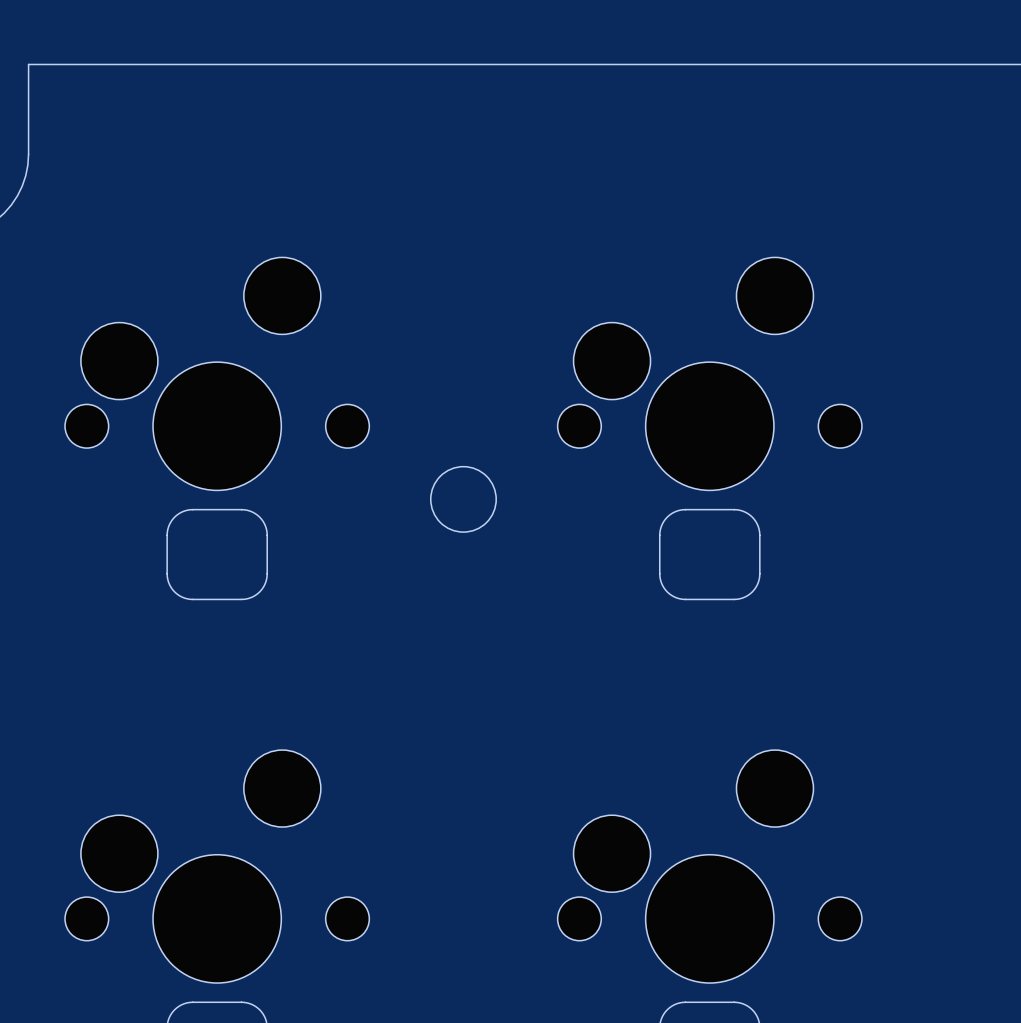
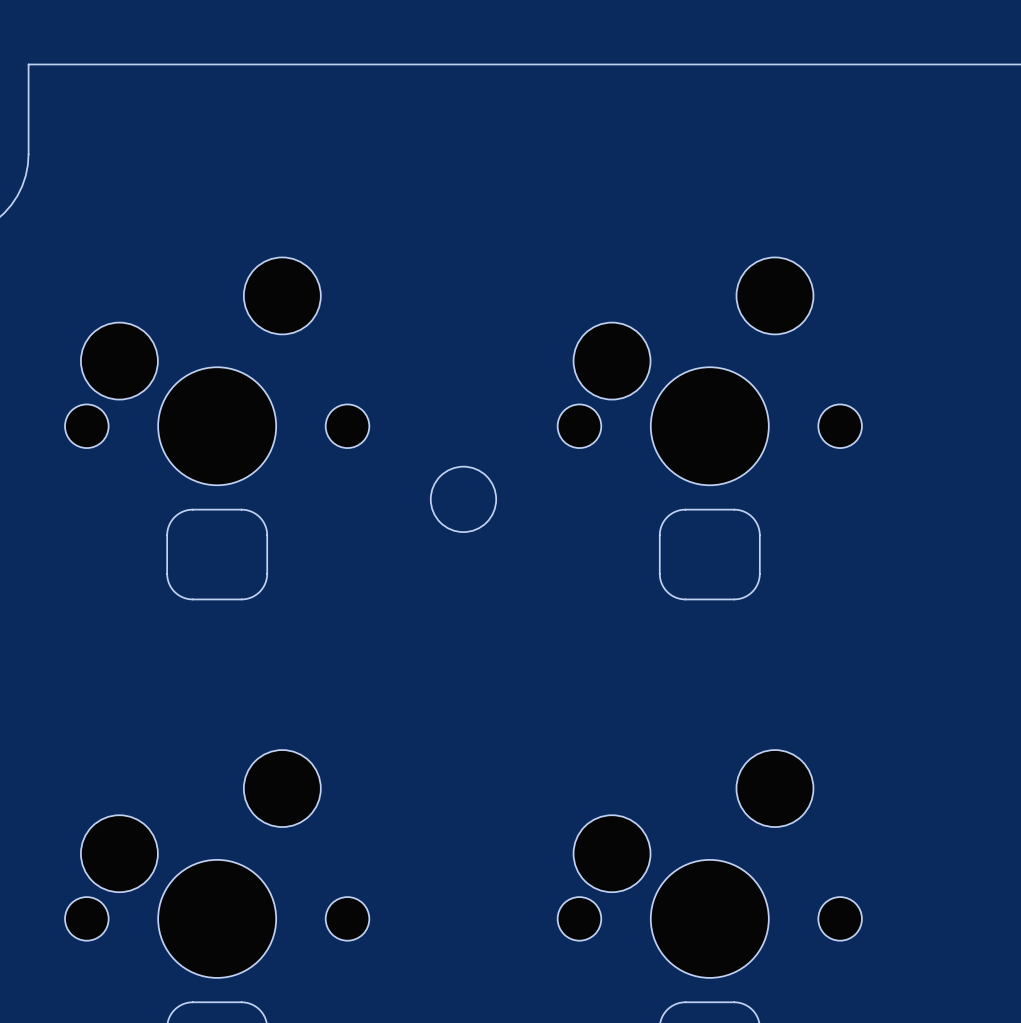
part footprint: [65, 257, 370, 491] -> [65, 257, 370, 486]
part footprint: [557, 257, 862, 491] -> [557, 257, 862, 486]
part footprint: [65, 750, 370, 984] -> [65, 750, 370, 978]
part footprint: [557, 750, 862, 984] -> [557, 750, 862, 978]

